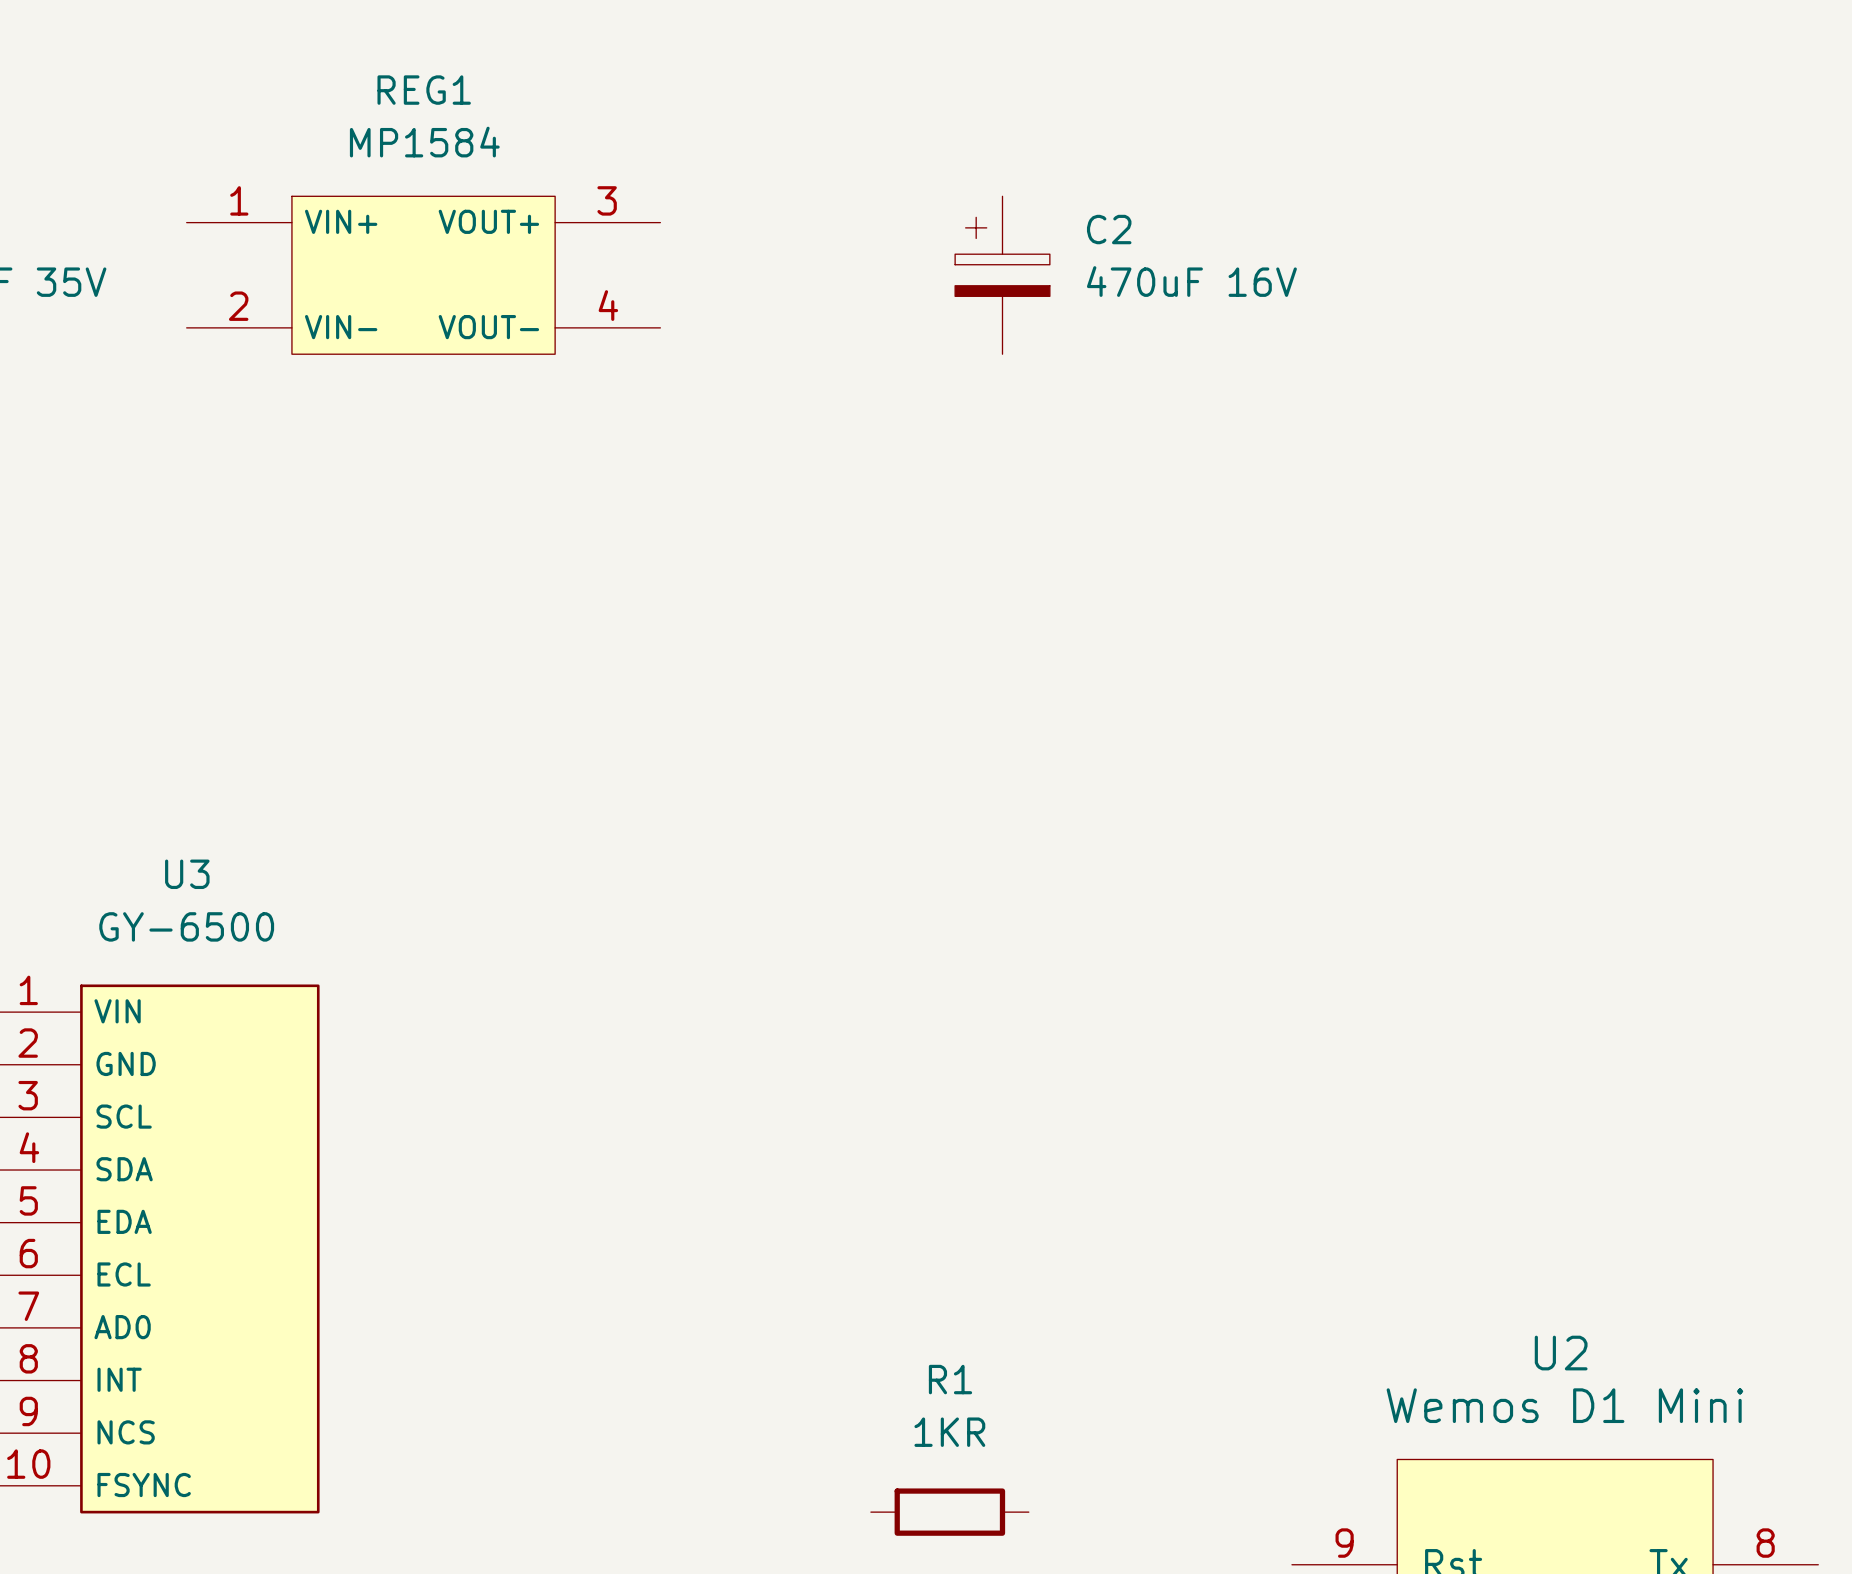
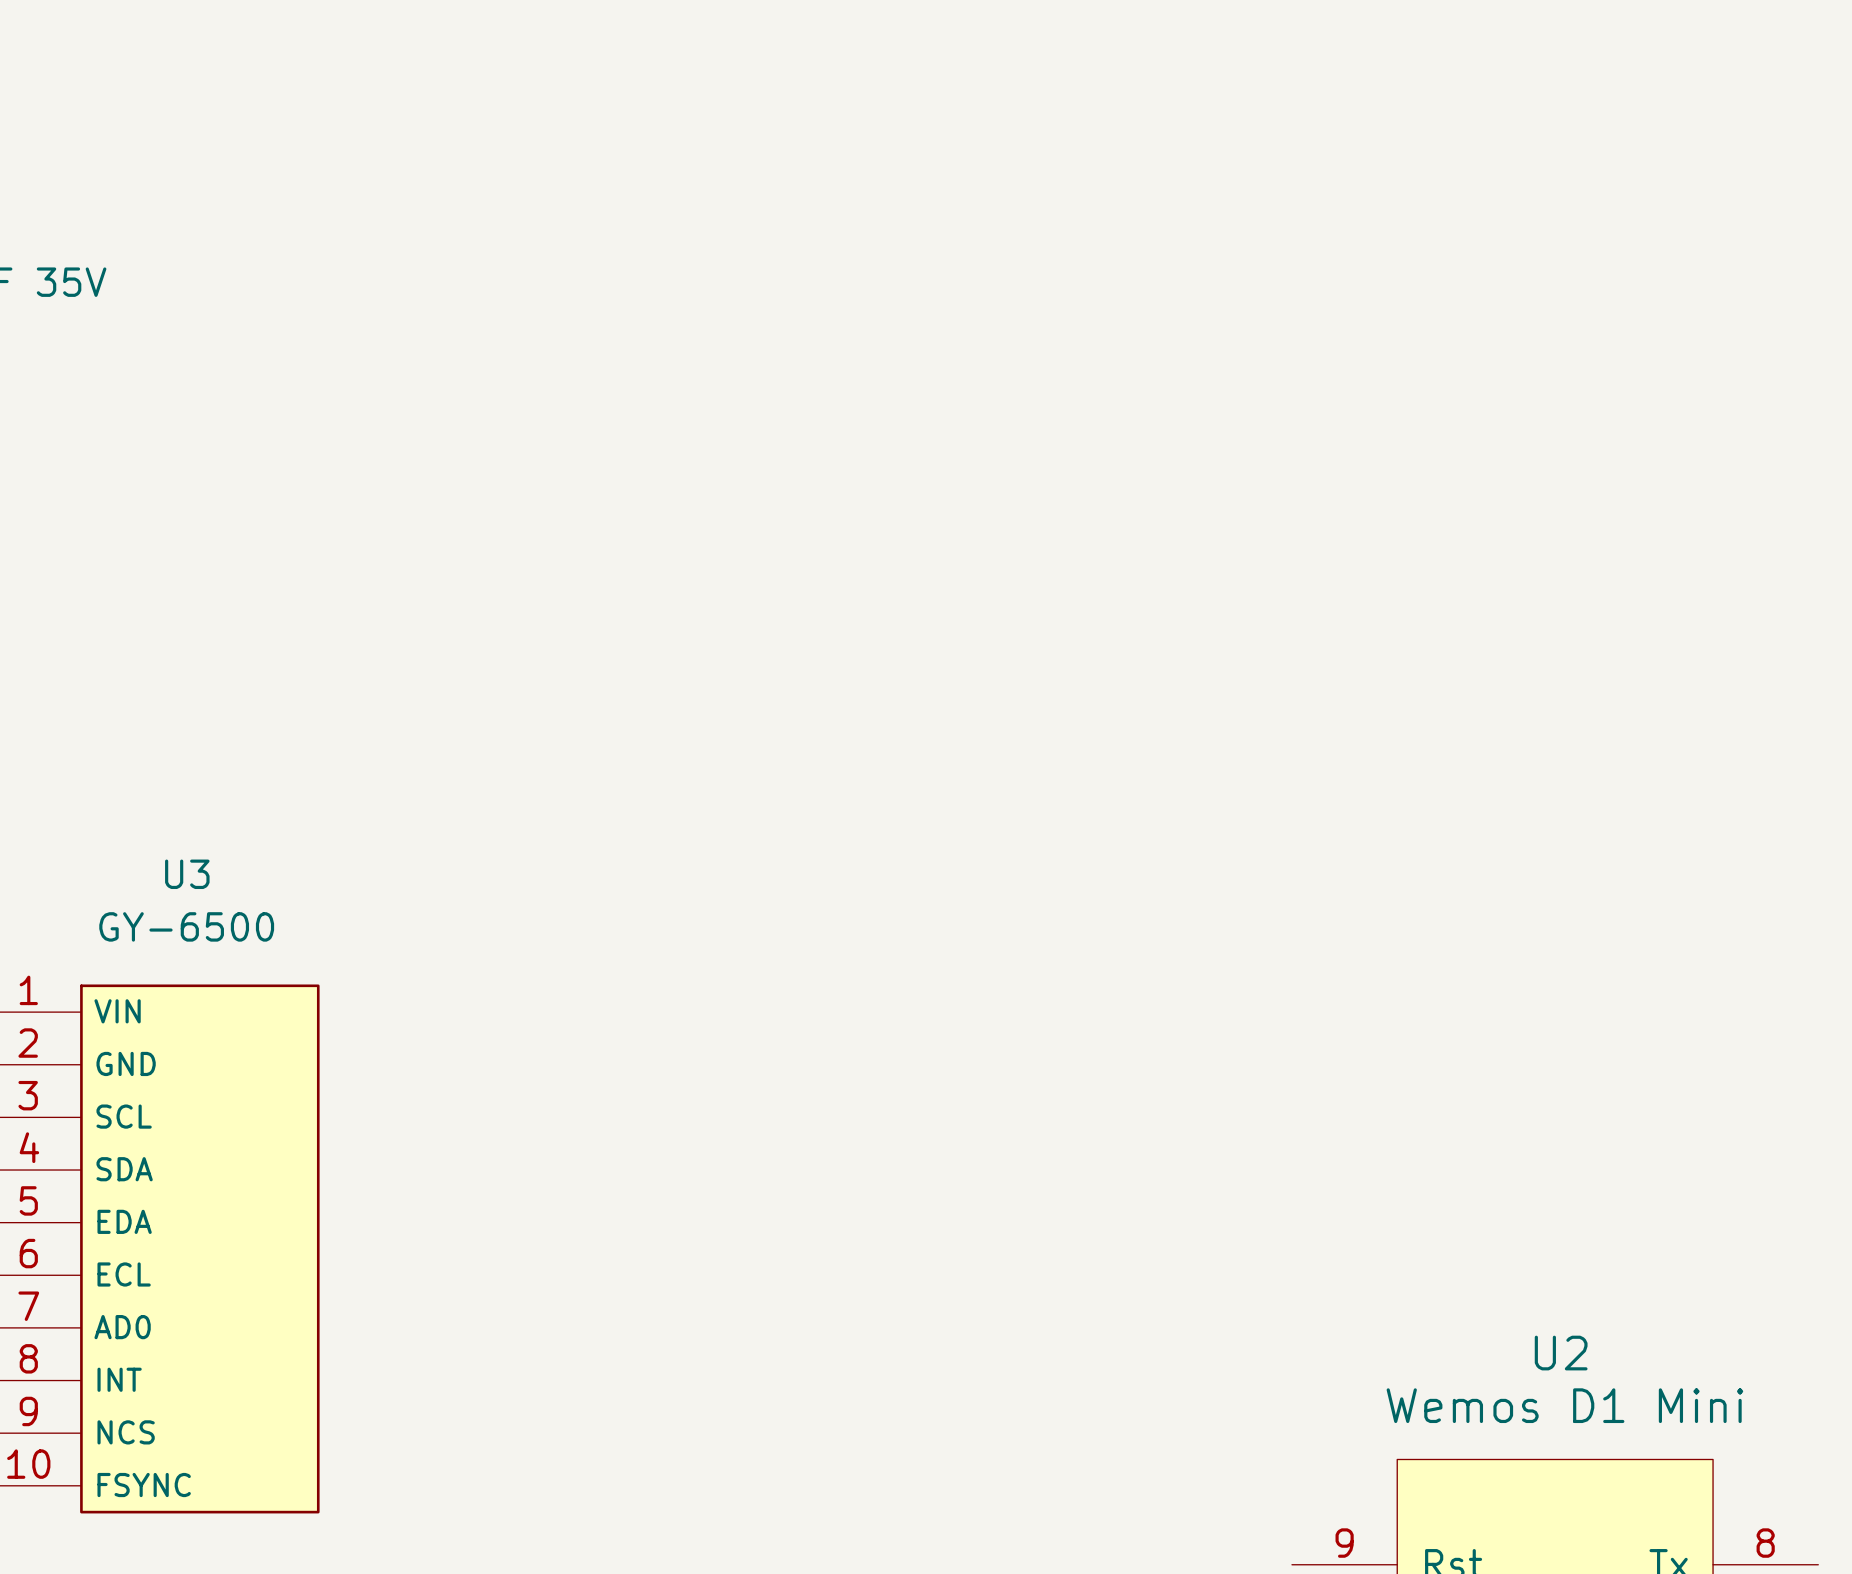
REG1: MP1584 (423, 275) -> none
C2: 470uF 16V (1002, 275) -> none
R1: 1KR (949, 1512) -> none

